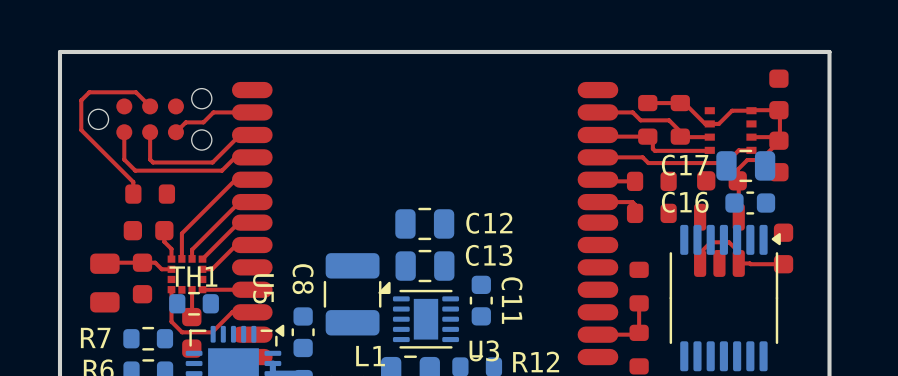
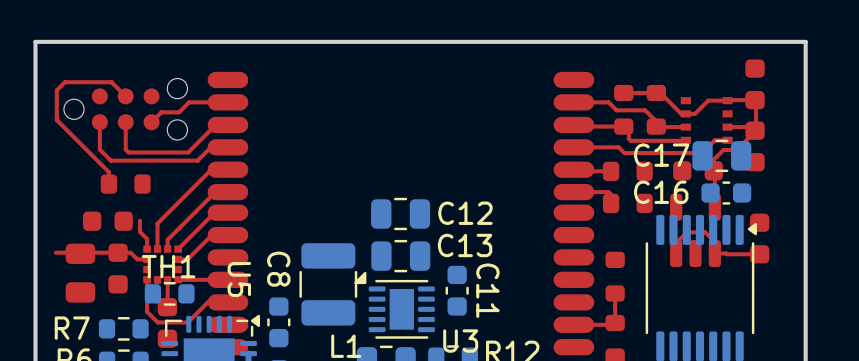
part position: (148, 230) -> (107, 221)

